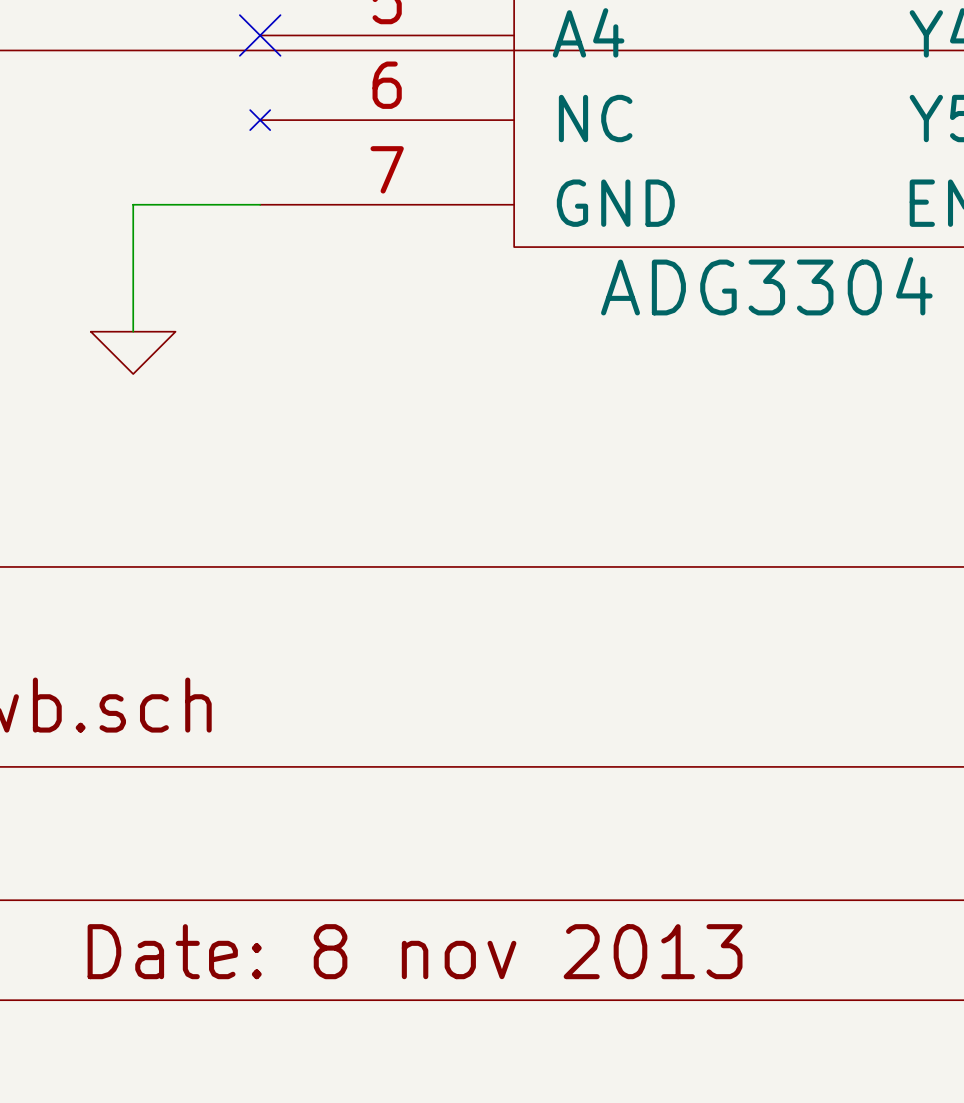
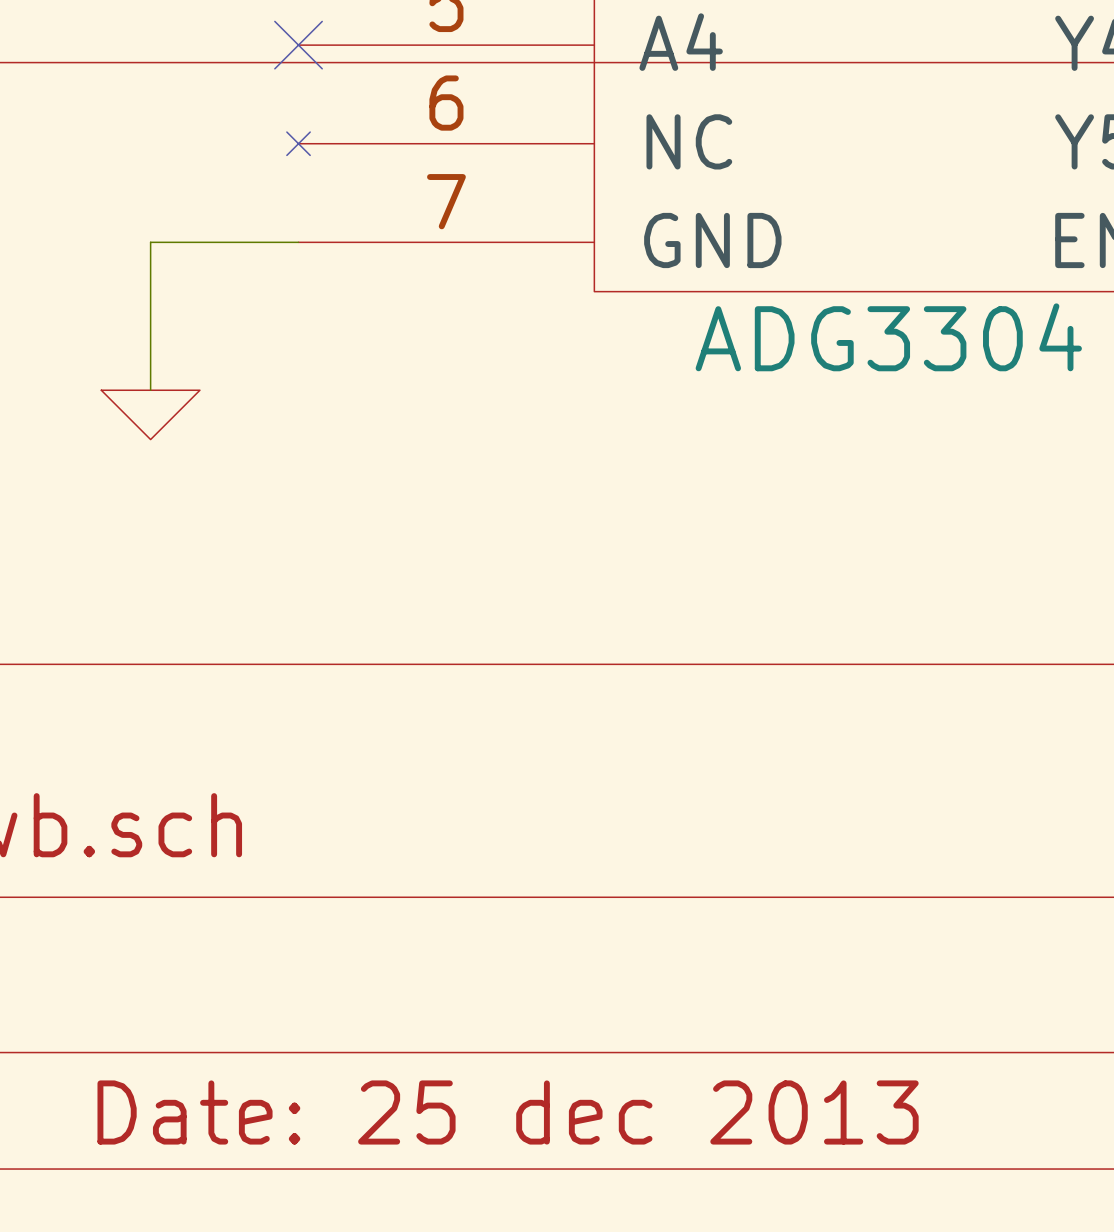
title block: Date: 8 nov 2013 (415, 951) -> Date: 25 dec 2013 (508, 1112)

